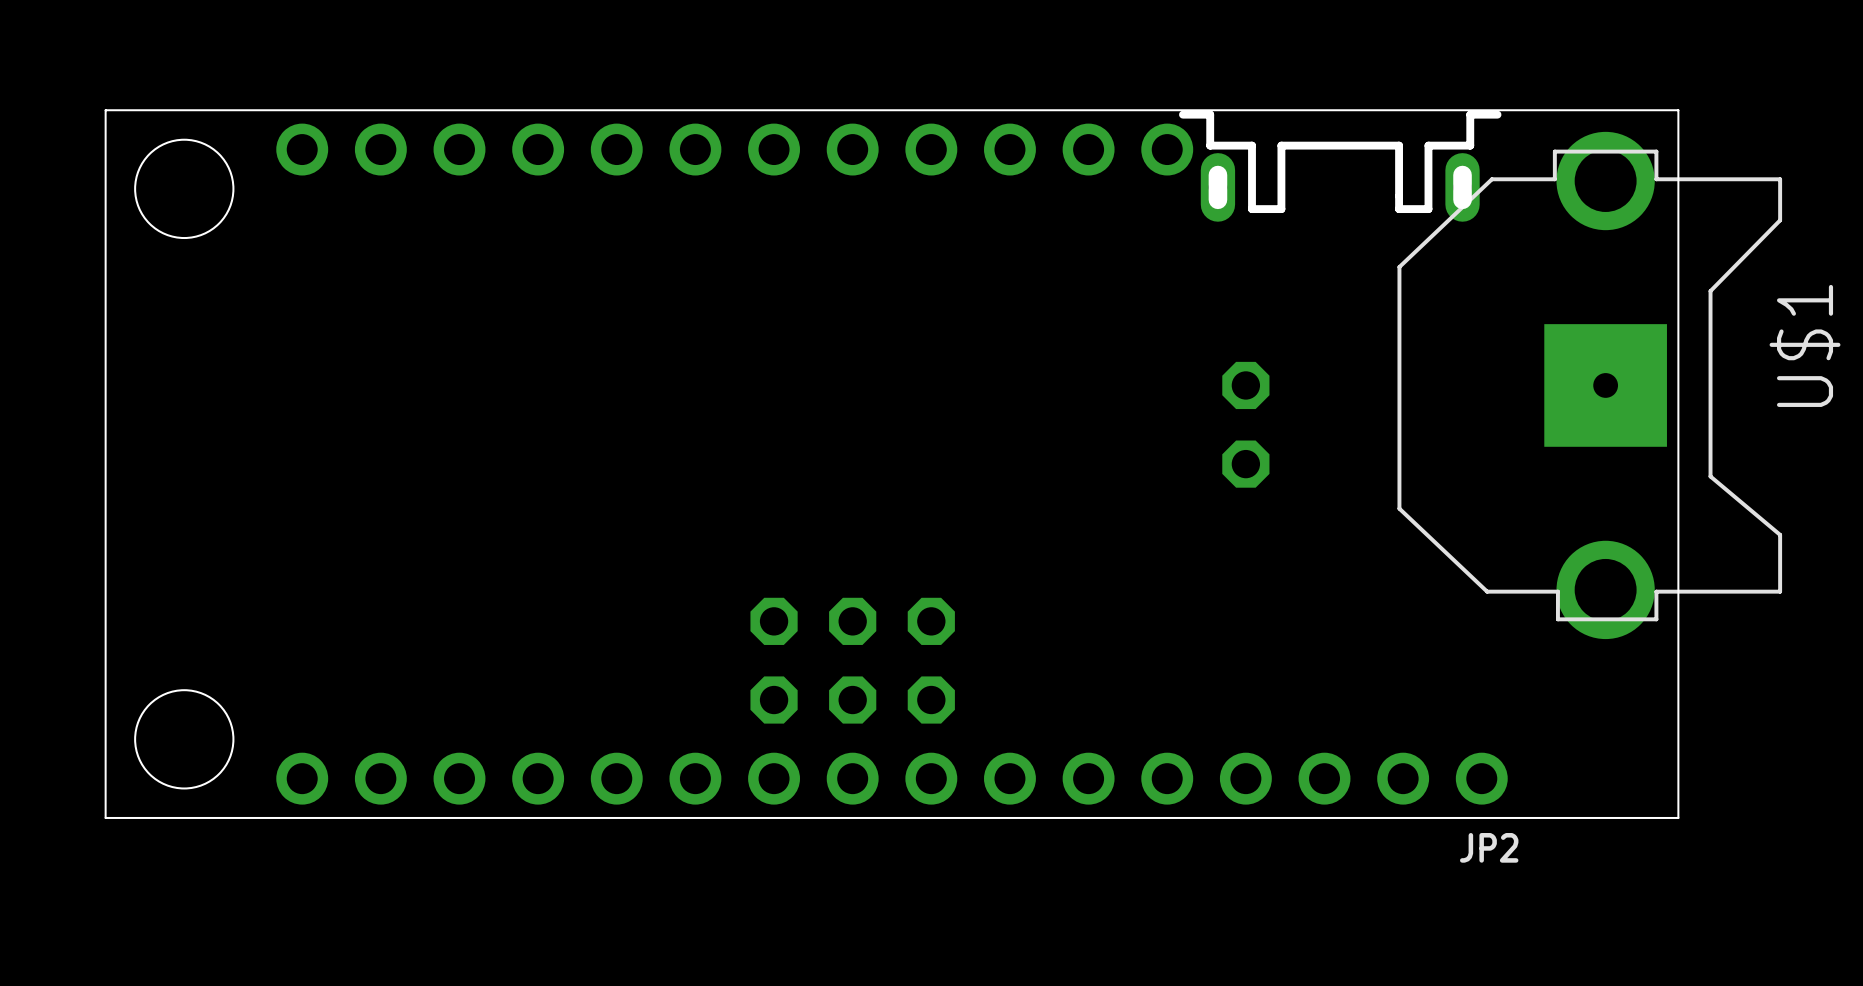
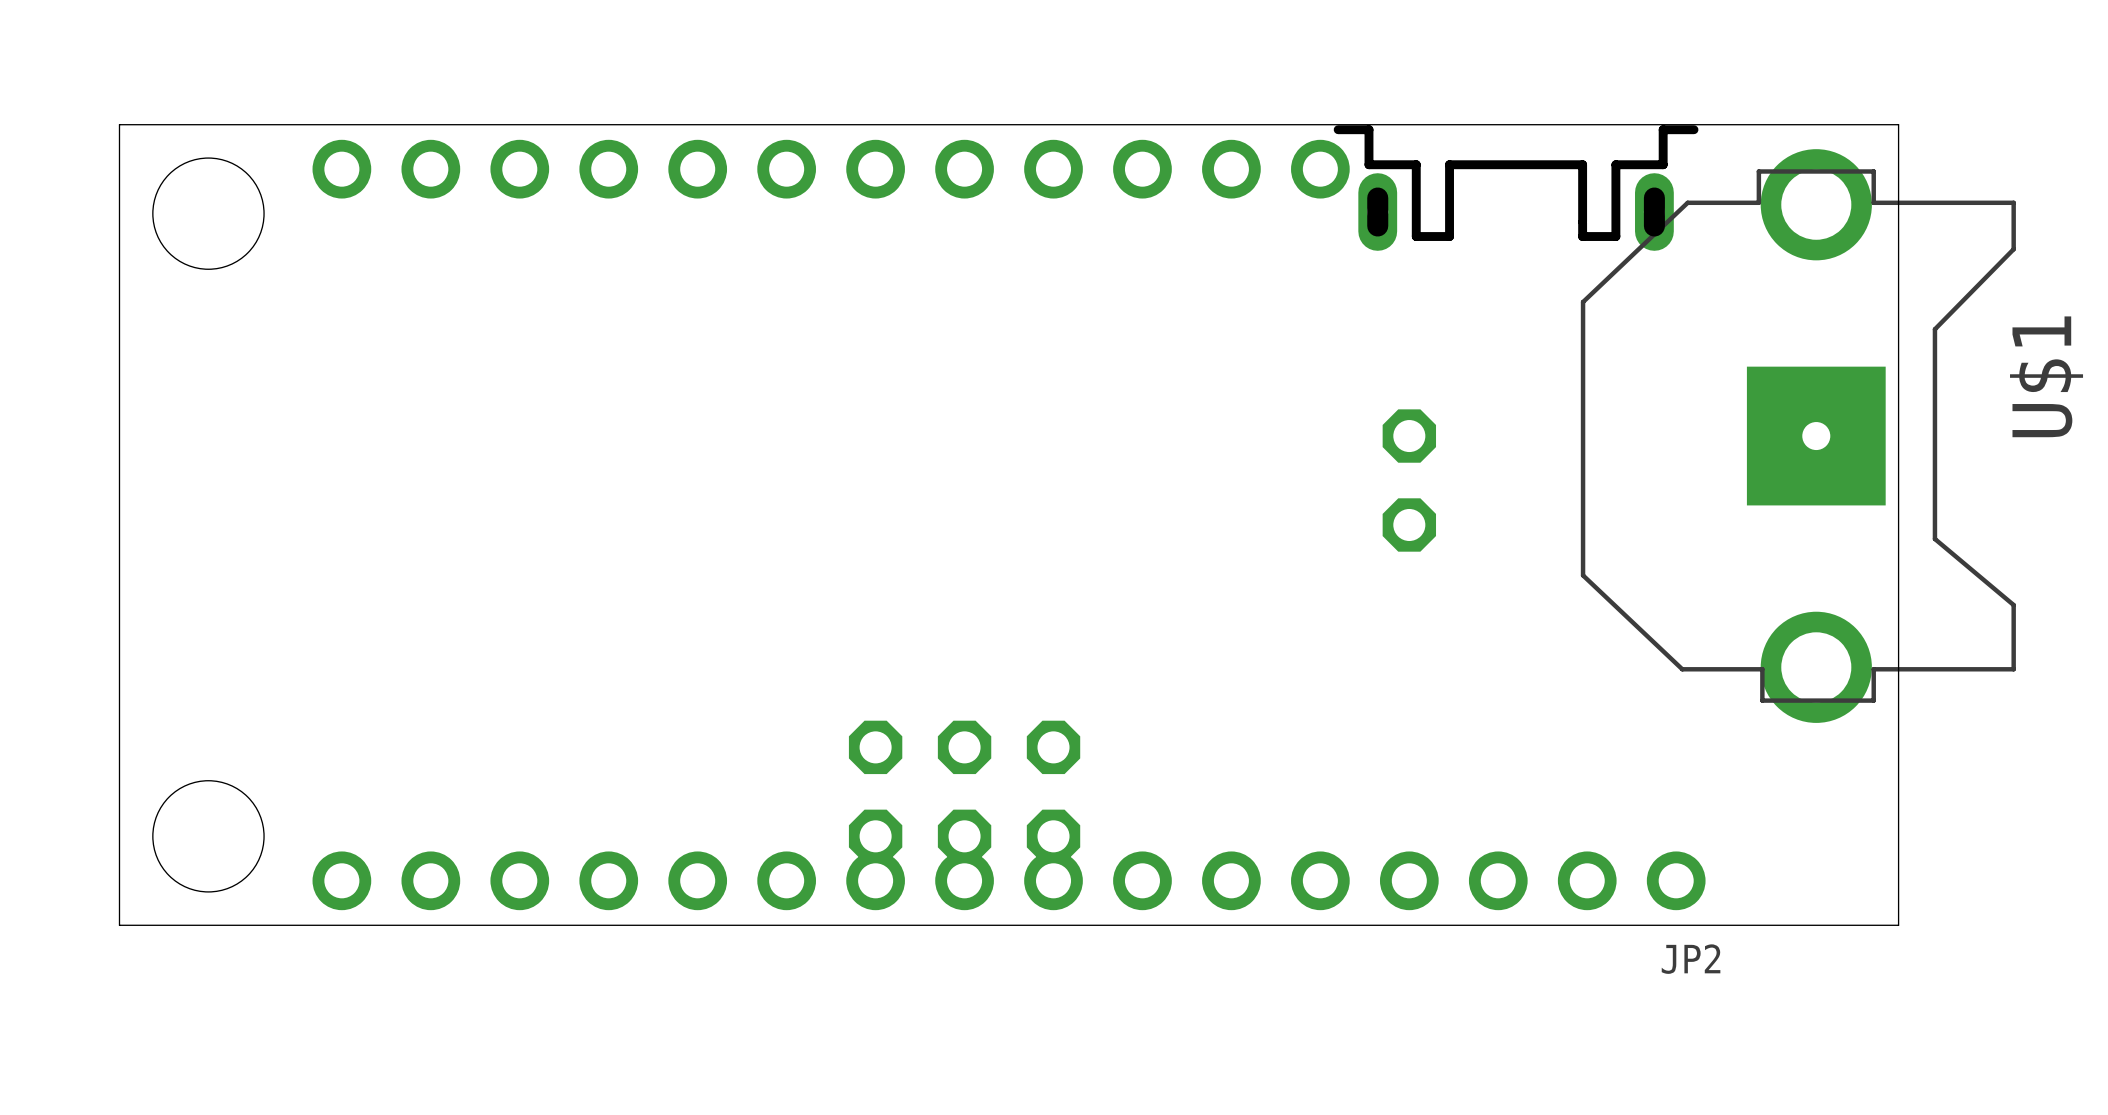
part position: (774, 660) -> (875, 791)
part position: (852, 660) -> (964, 791)
part position: (931, 660) -> (1053, 791)

